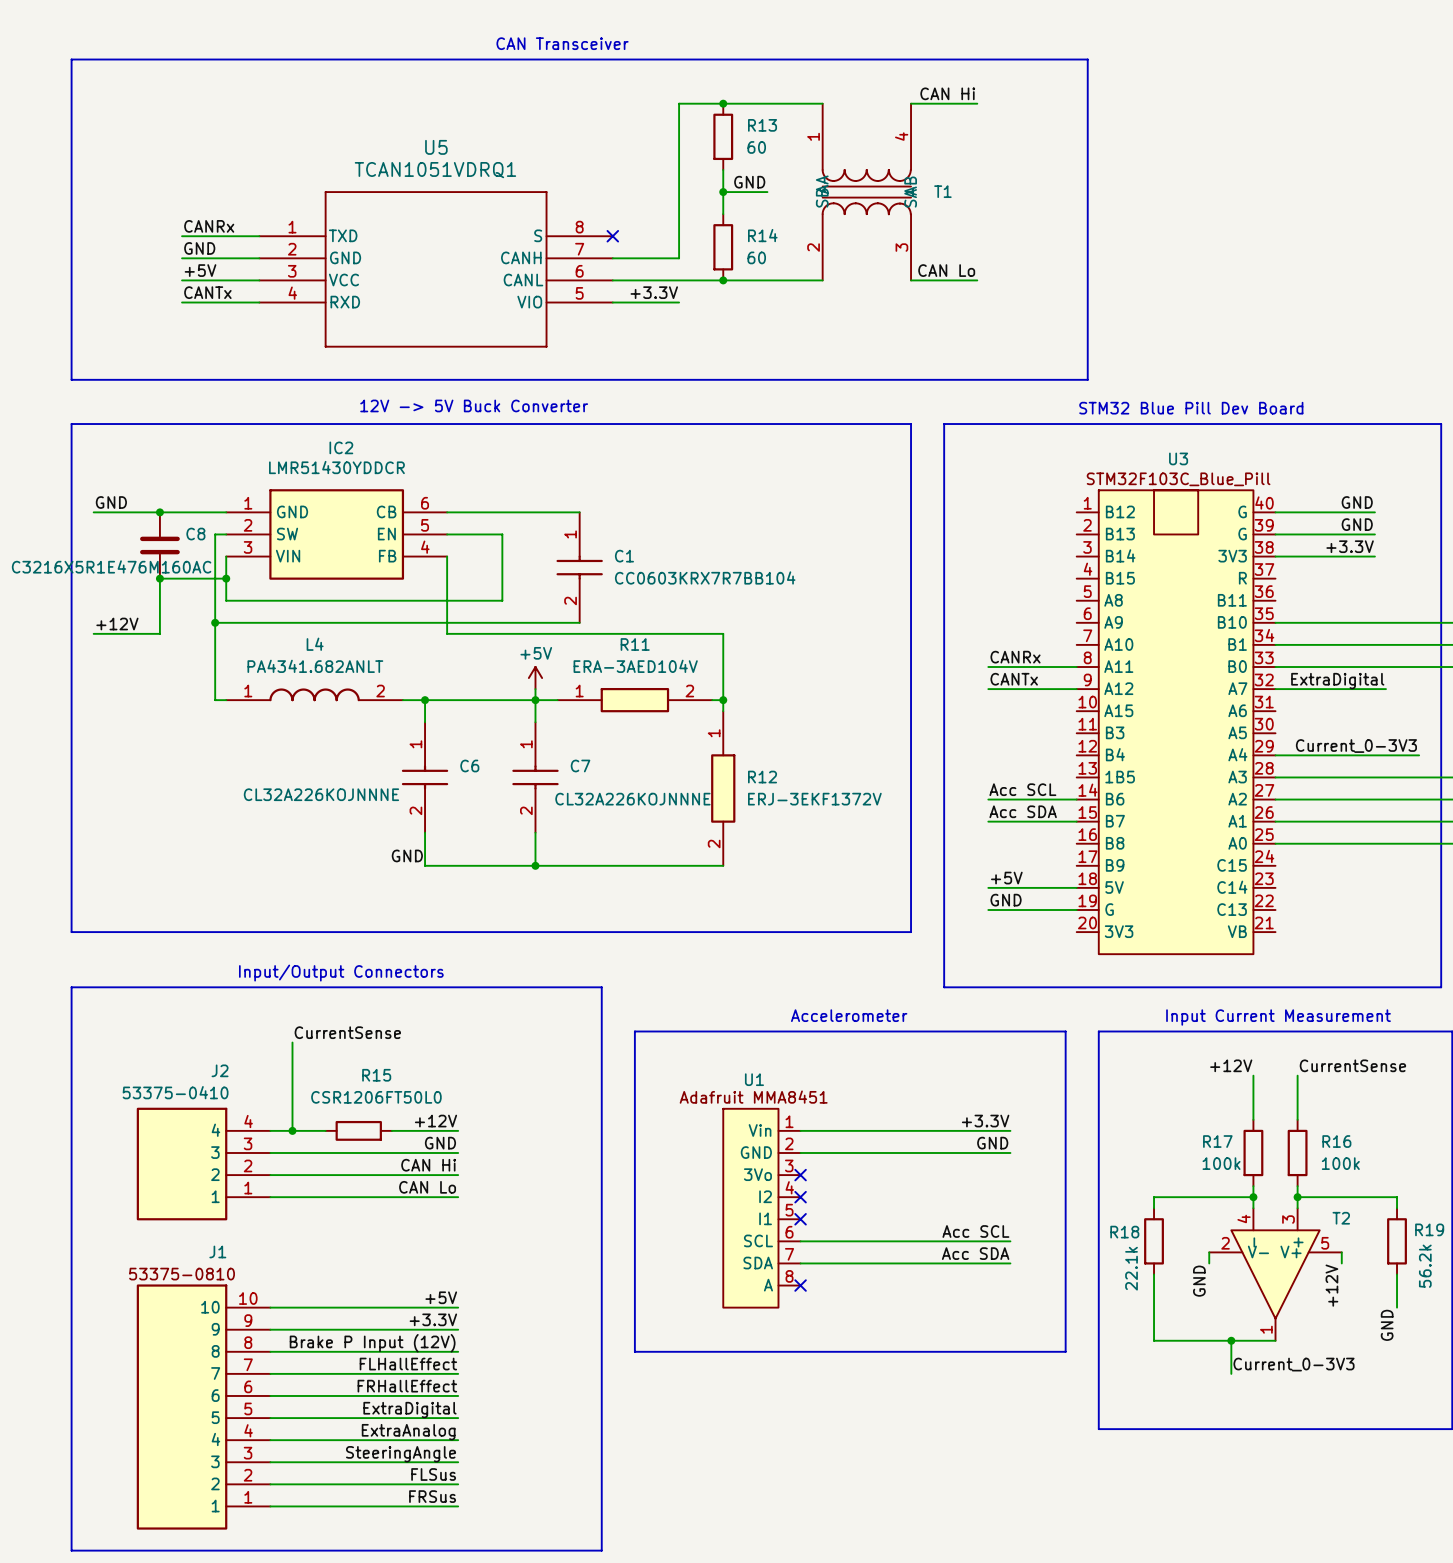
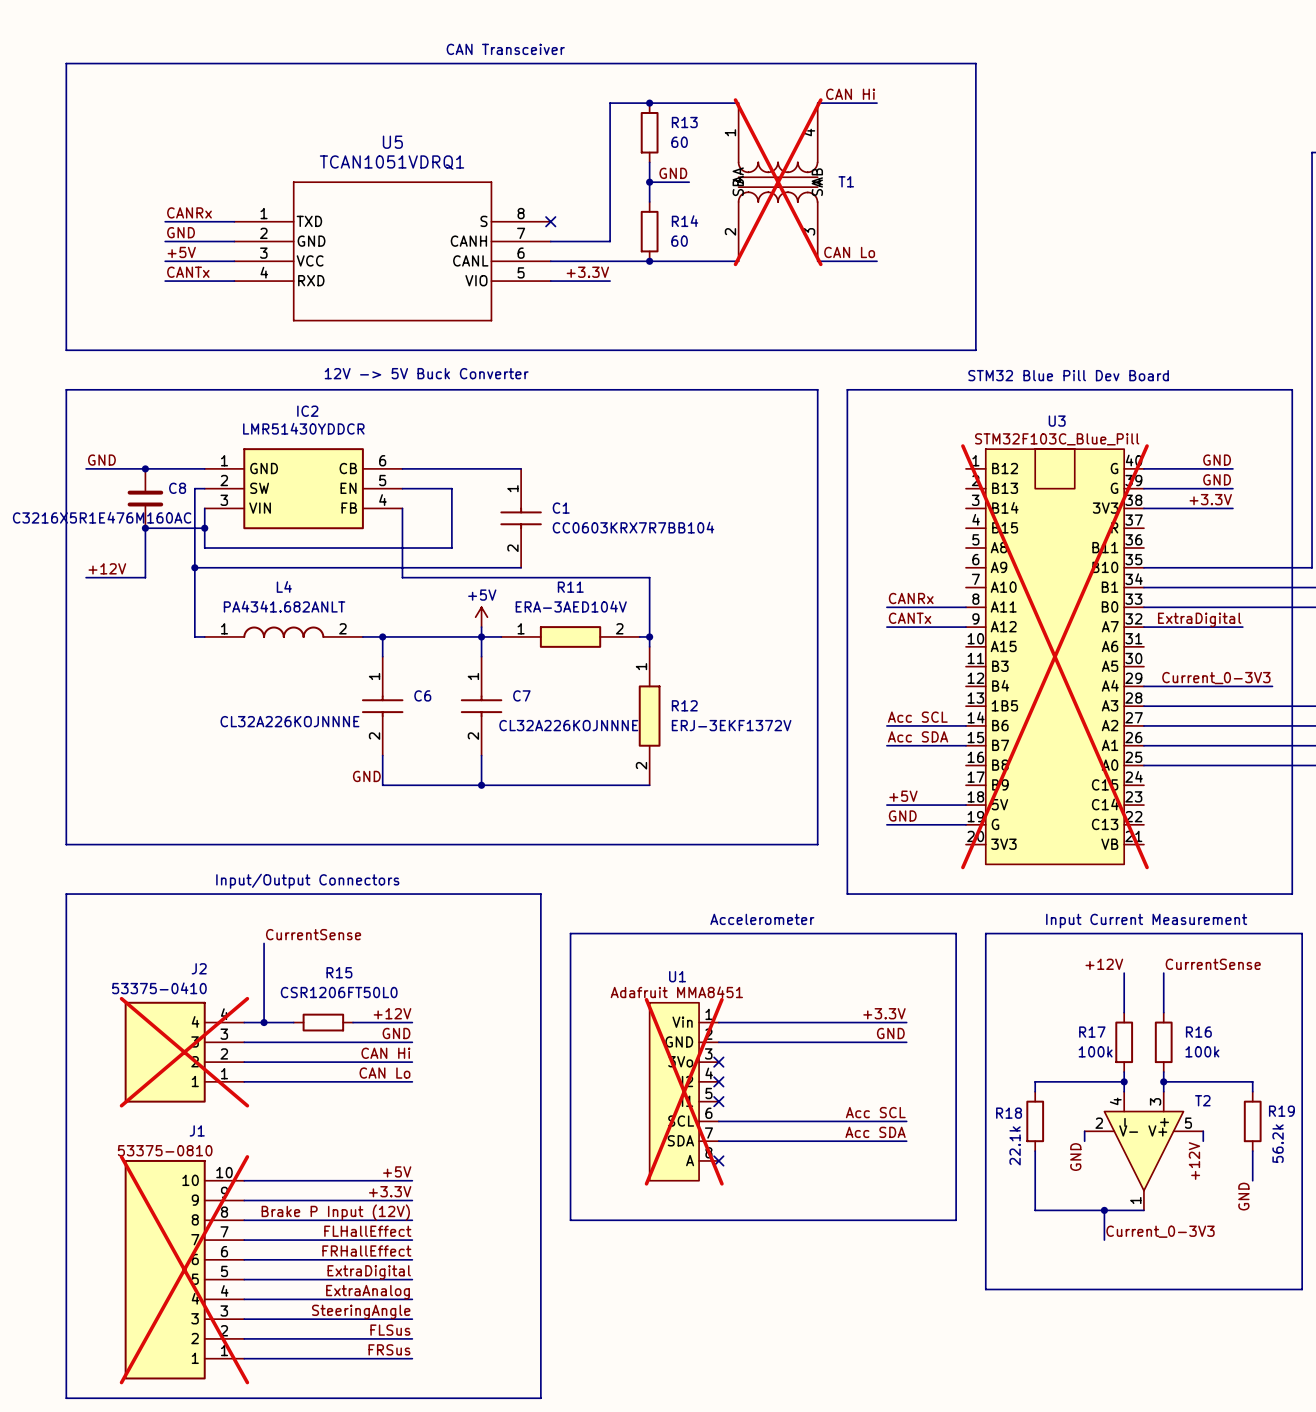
T1 do-not-place cross: none -> (778, 182)
U3 do-not-place cross: none -> (1054, 656)
J2 do-not-place cross: none -> (184, 1052)
U1 do-not-place cross: none -> (684, 1091)
J1 do-not-place cross: none -> (184, 1269)

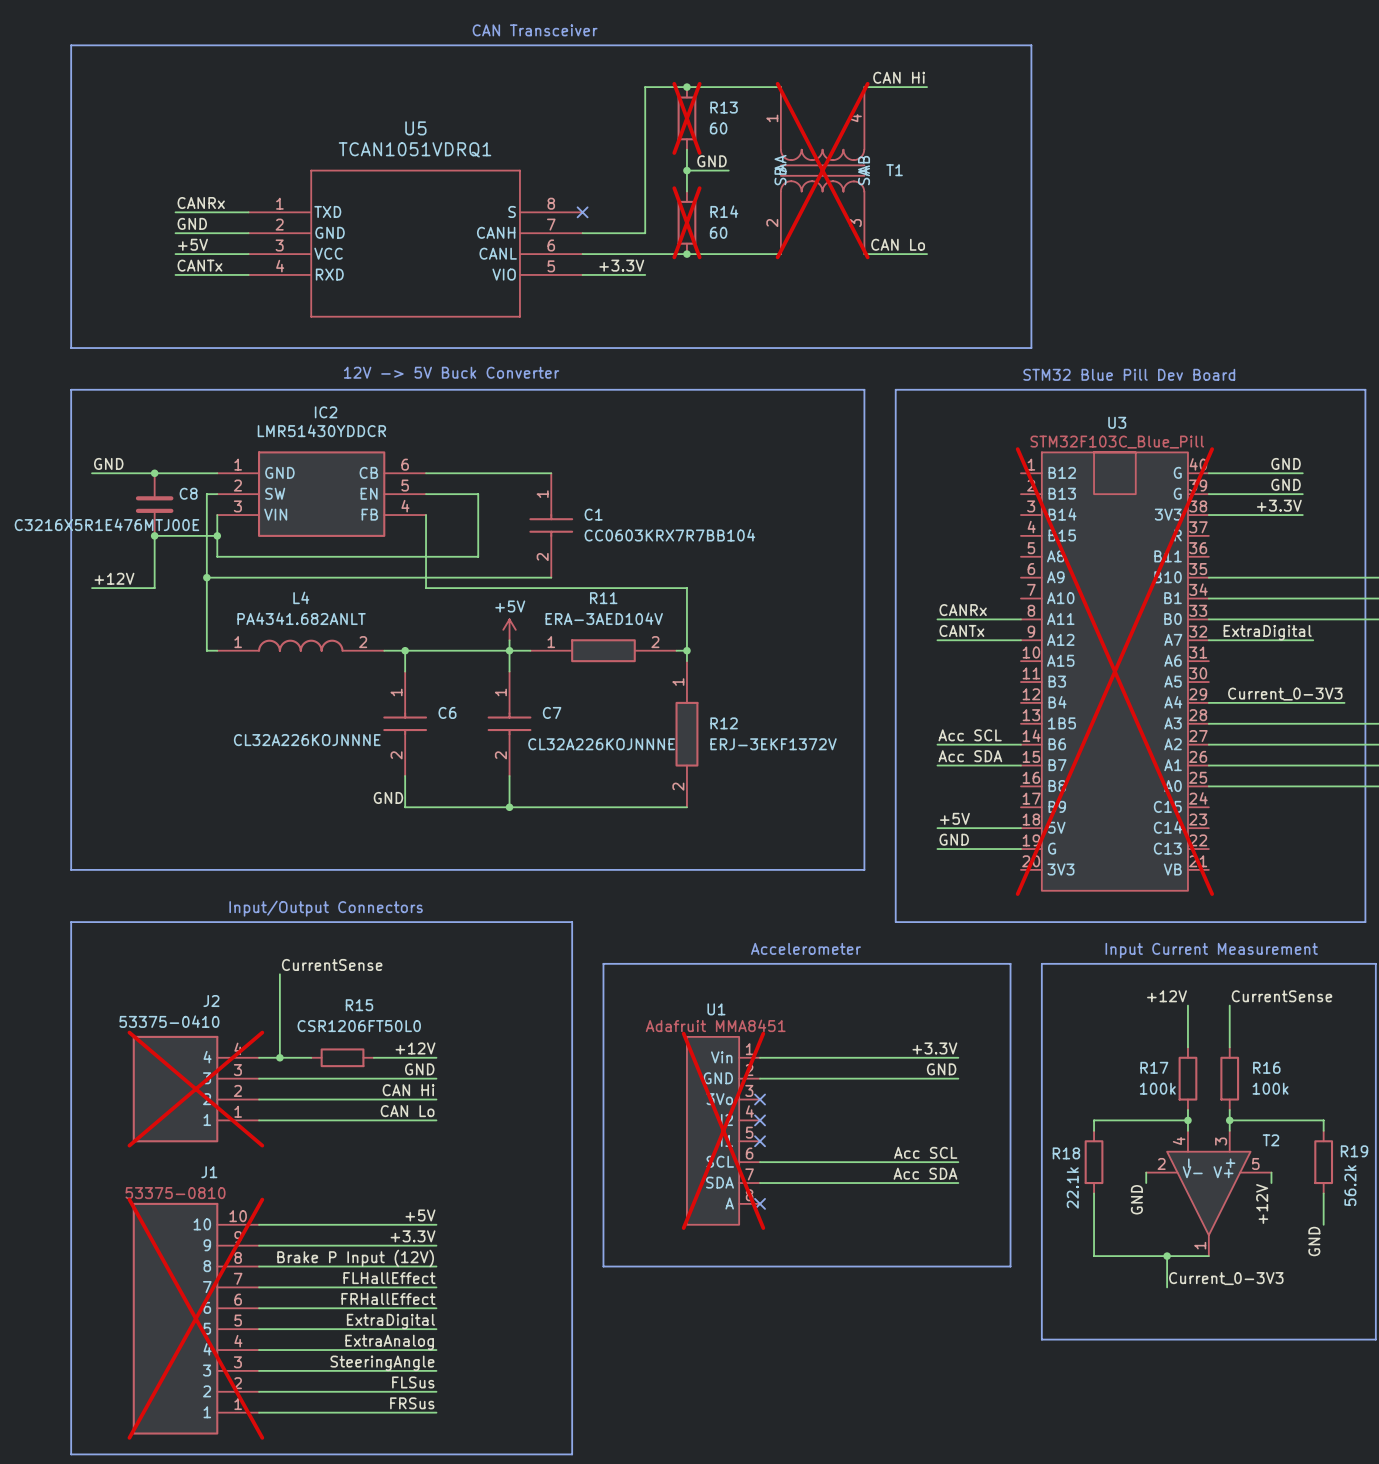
R13 do-not-place cross: none -> (686, 118)
R14 do-not-place cross: none -> (686, 222)
C8 value: C3216X5R1E476M160AC (102, 517) -> C3216X5R1E476MTJ00E (106, 524)

